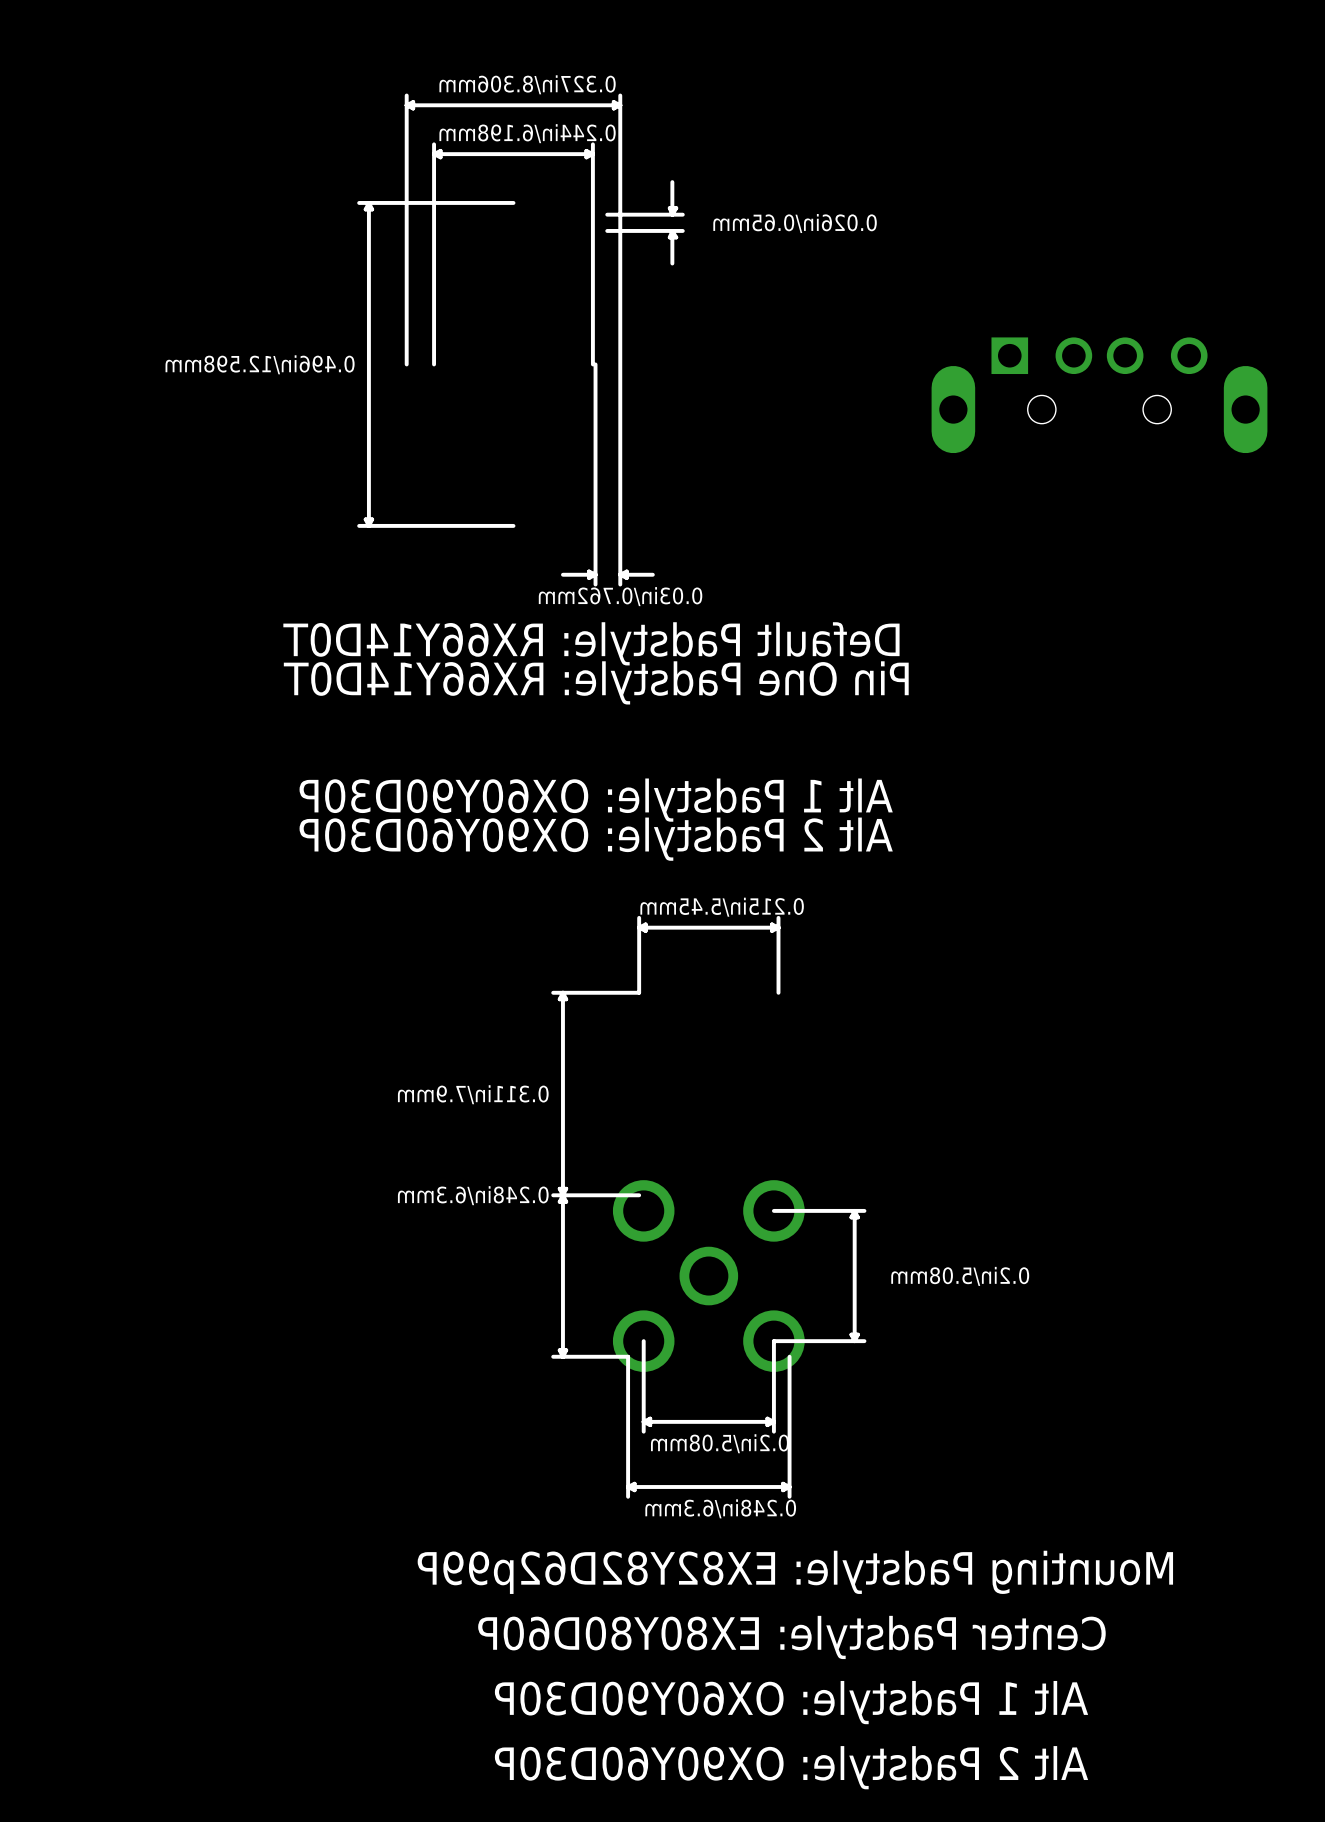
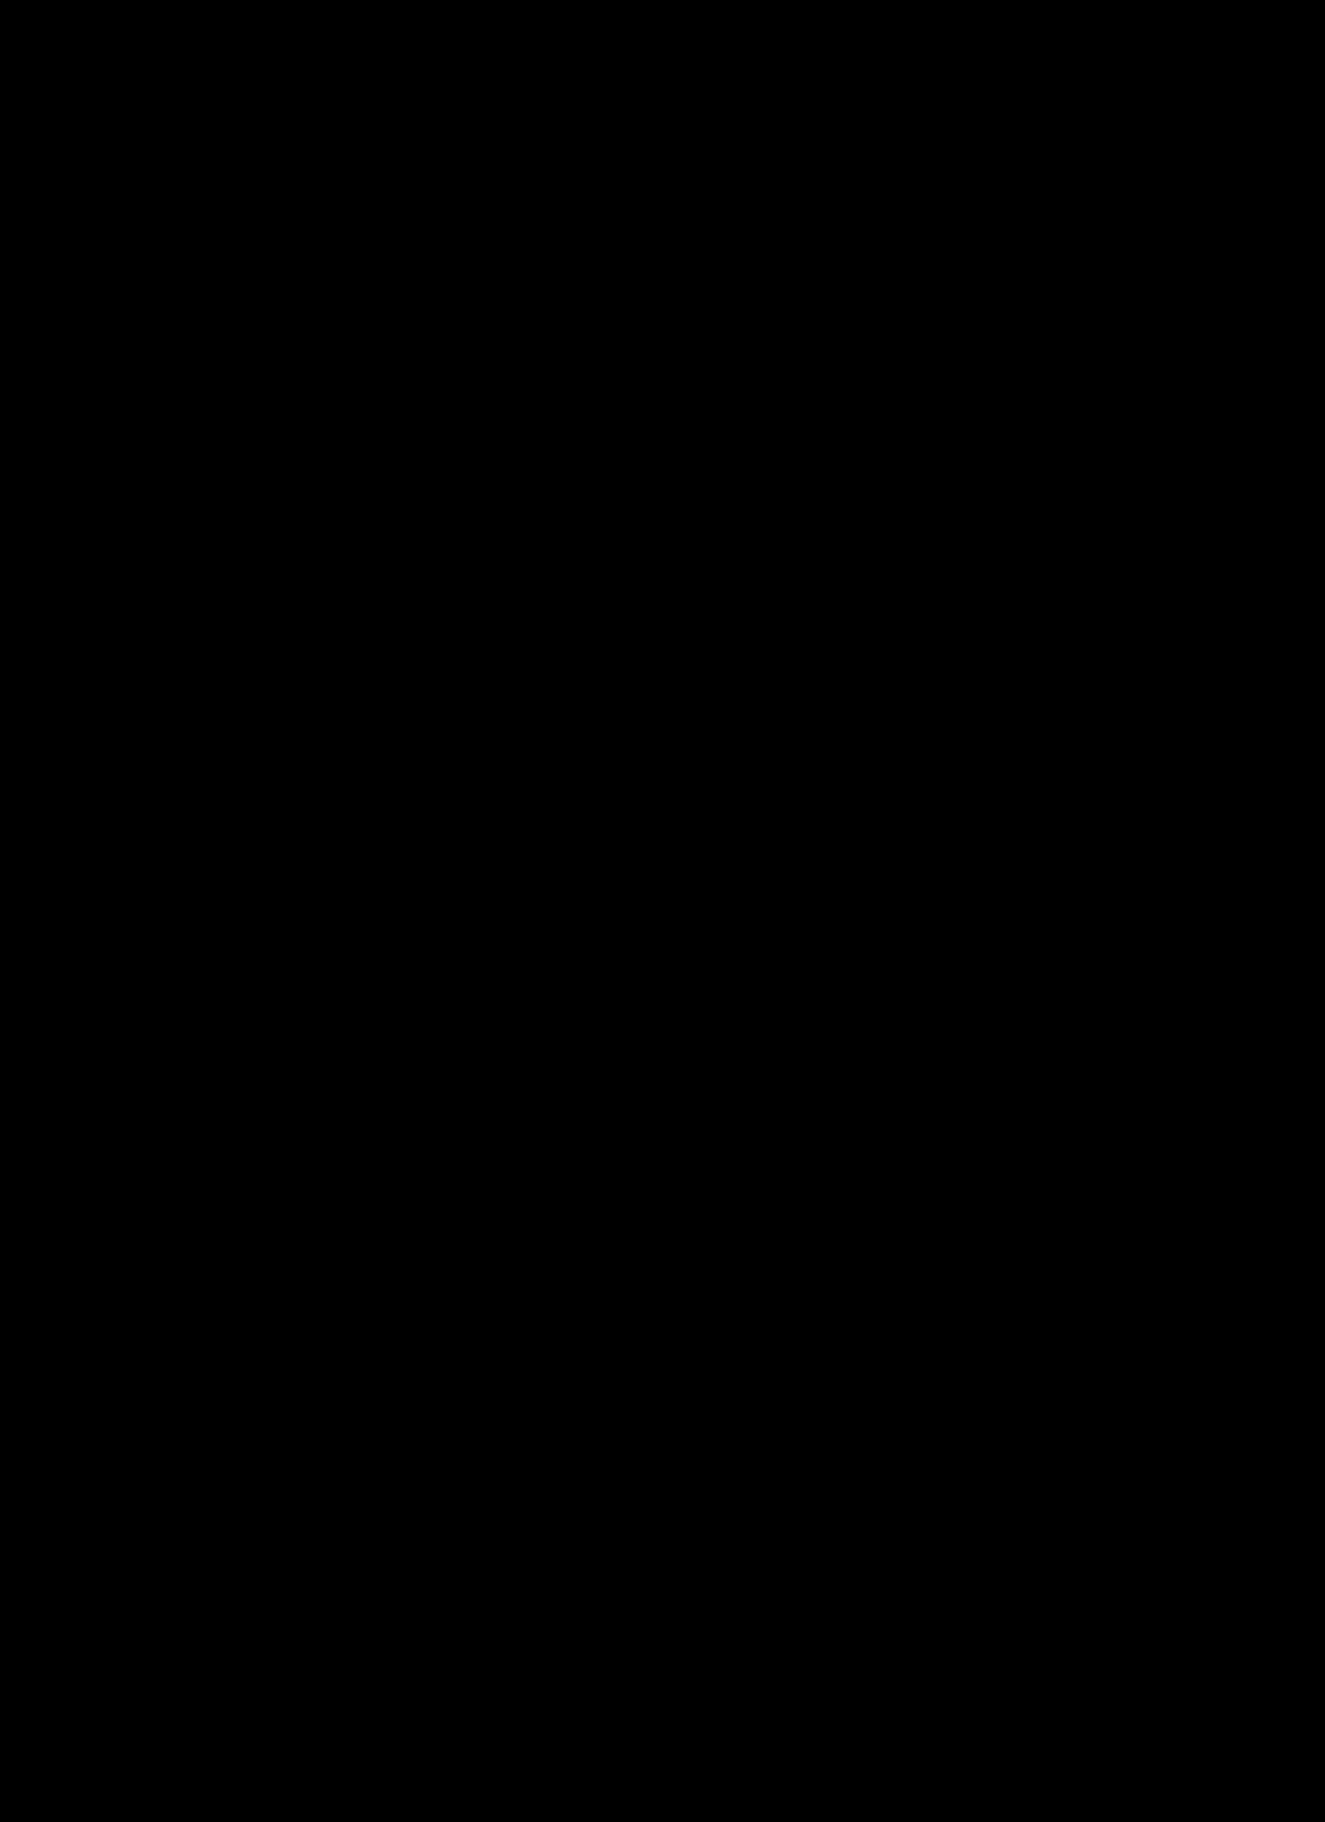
part: (520, 340) -> none
part: (1099, 395) -> none
part: (708, 1207) -> none

